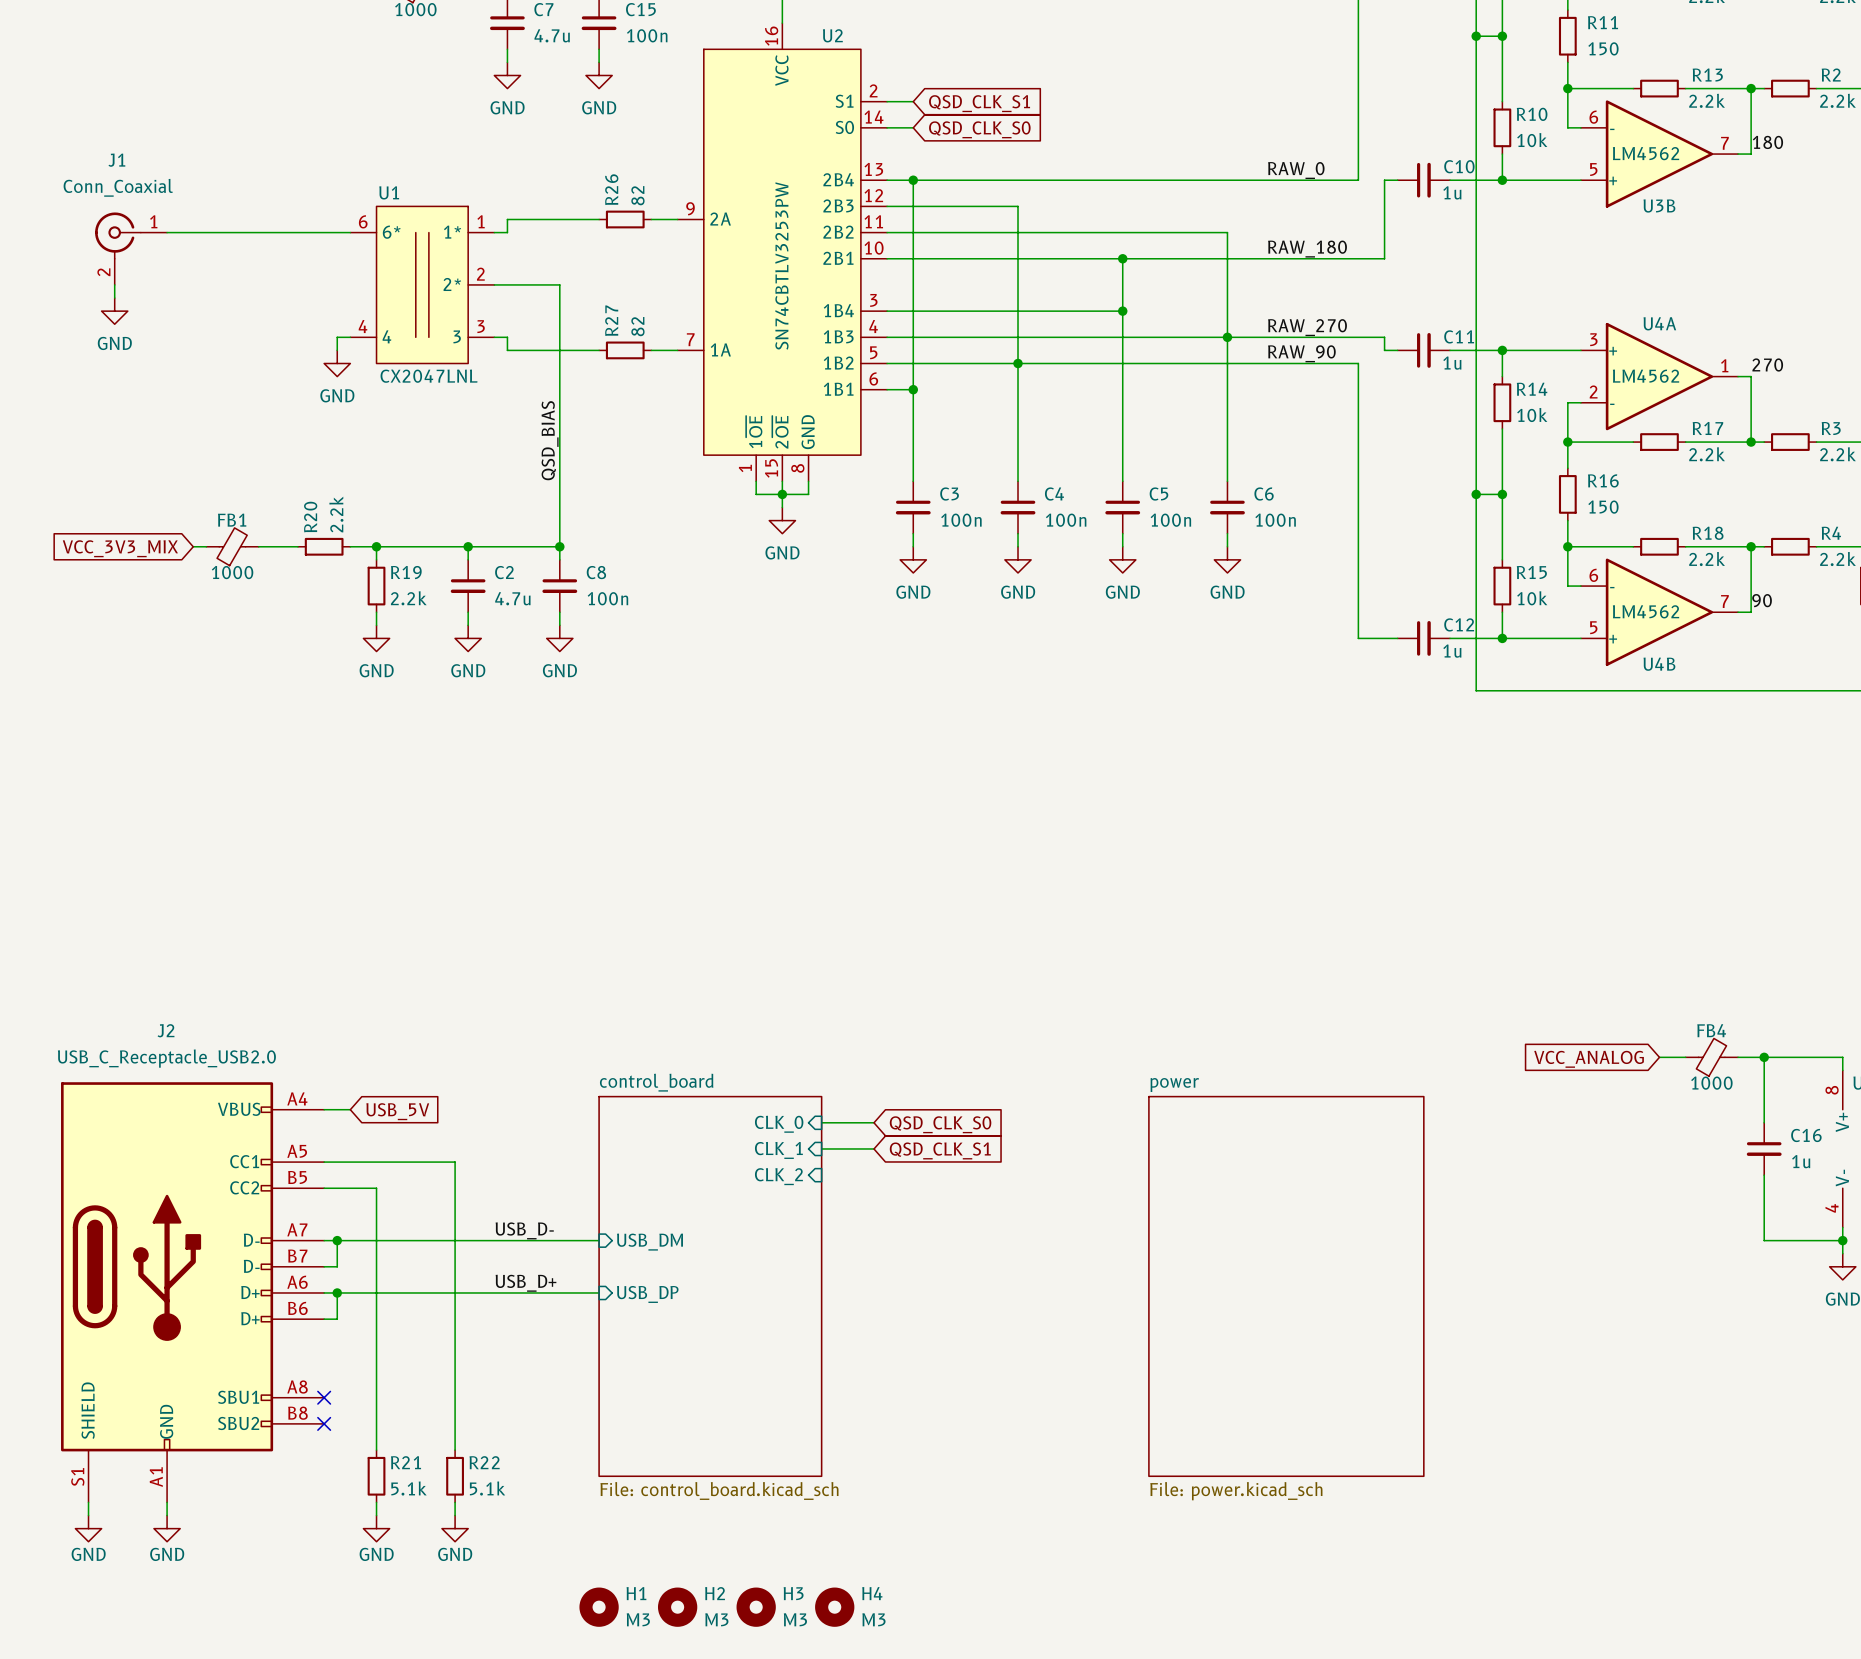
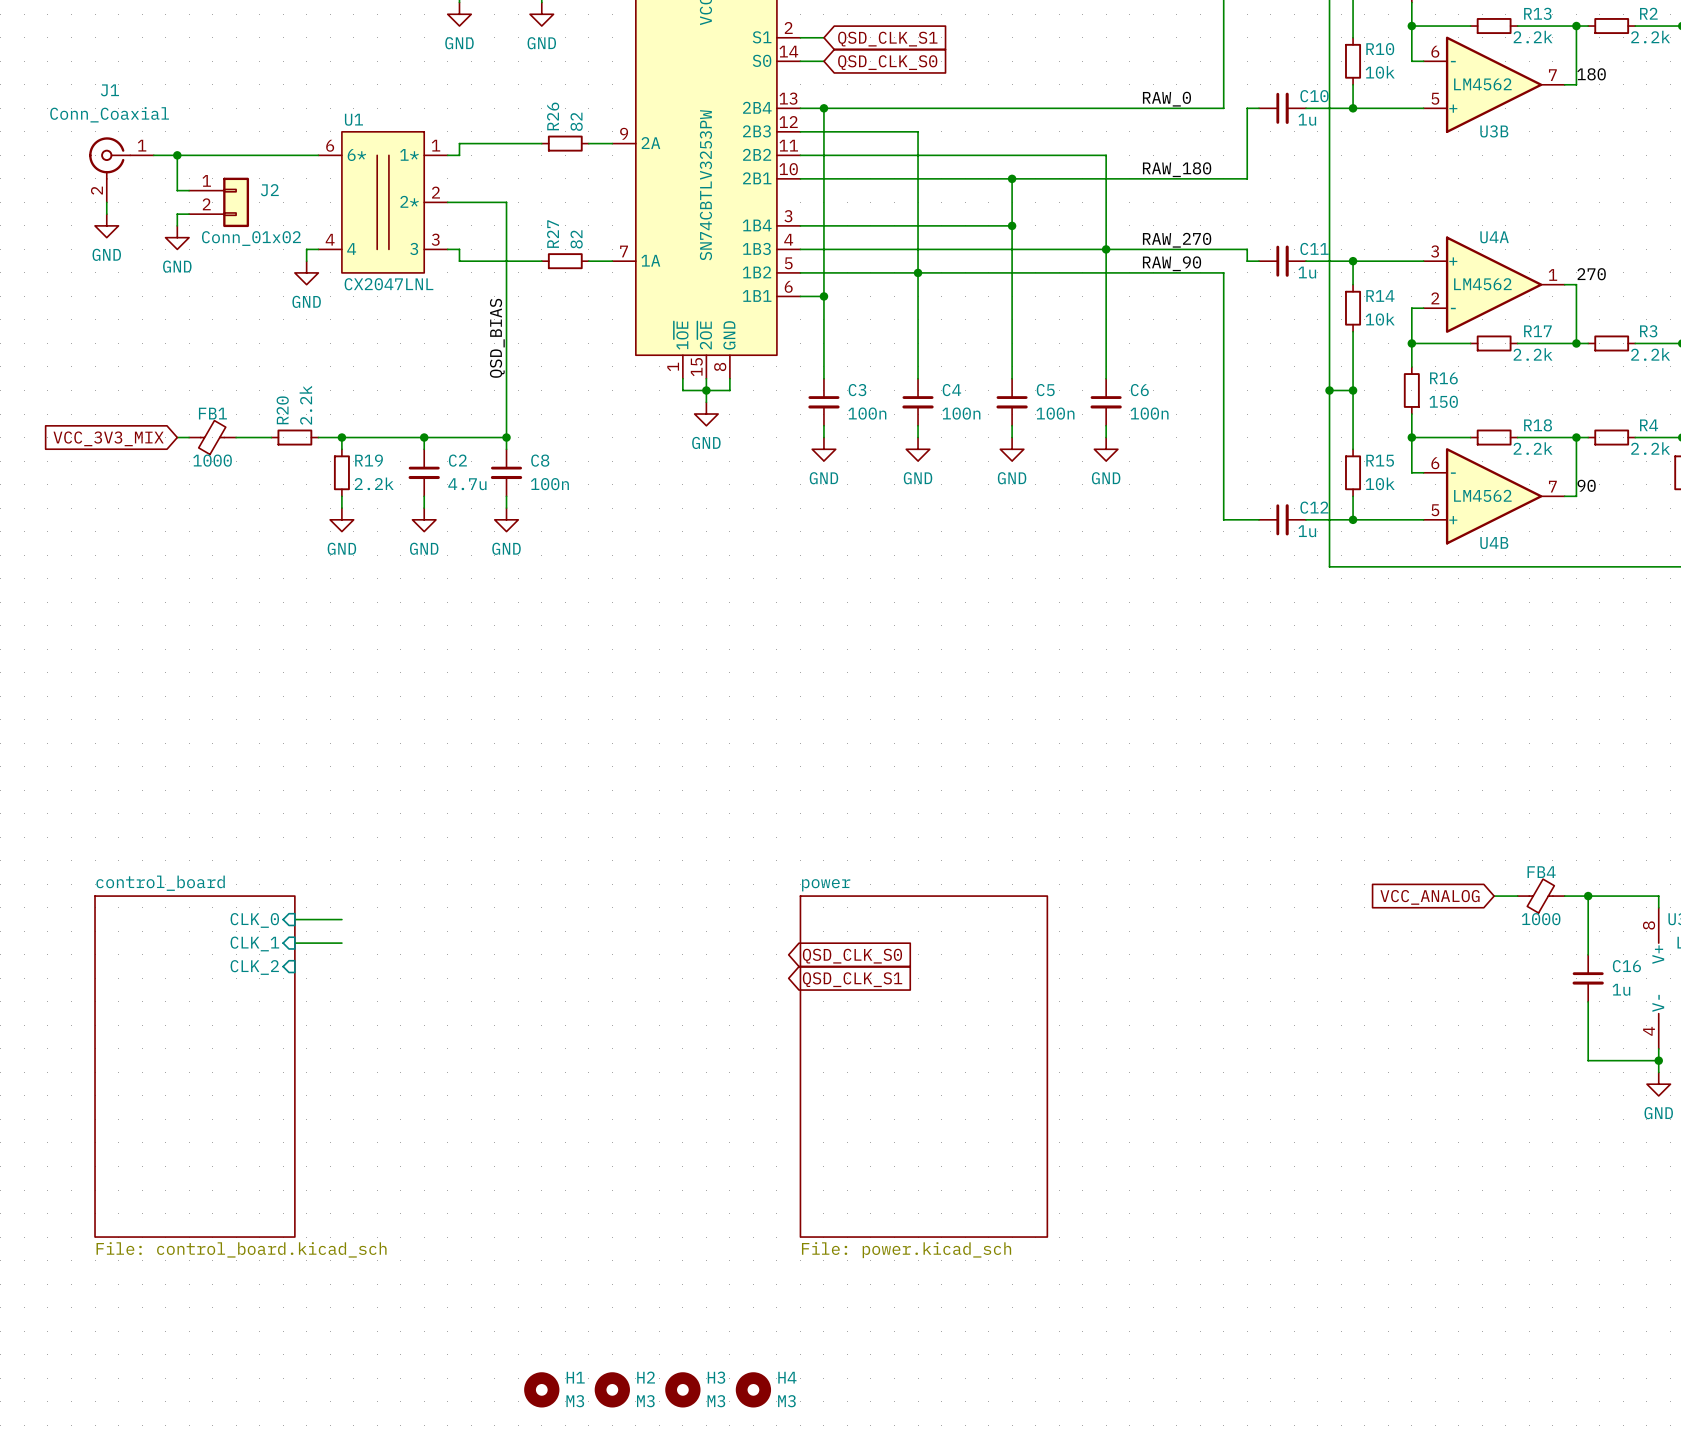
wire: none -> (177, 155) (177, 190) (189, 190)
junction: none -> (177, 155)
wire: none -> (189, 214) (177, 214) (177, 225)
power symbol: none -> GND (177, 237)
J2 name position: J2 (166, 1030) -> J2 (269, 190)
J2 value: USB_C_Receptacle_USB2.0 (166, 1058) -> Conn_01x02 (251, 238)
J2 symbol: [61, 1082, 325, 1503] -> [189, 177, 250, 228]
wire: none -> (294, 919) (341, 919)
sheet pin: none -> CLK_0 (254, 920)
wire: none -> (318, 943) (341, 943)
sheet pin: none -> CLK_1 (254, 943)
global label: USB_5V (397, 1111) -> none
wire: (821, 1122) (874, 1122) -> none
sheet pin: CLK_0 (779, 1124) -> none
sheet pin: none -> CLK_2 (254, 967)
wire: (821, 1148) (874, 1148) -> none
sheet pin: CLK_1 (778, 1150) -> none
wire: (324, 1162) (455, 1162) (455, 1450) -> none
sheet pin: CLK_2 (778, 1176) -> none
wire: (324, 1188) (376, 1188) (376, 1450) -> none
label: USB_D- (524, 1230) -> none
wire: (324, 1240) (599, 1240) -> none
wire: (337, 1240) (337, 1266) (324, 1266) -> none
junction: (337, 1240) -> none
sheet pin: USB_DM (649, 1242) -> none
sheet control_board: none -> File: control_board.kicad_sch (194, 1066)
sheet power: none -> File: power.kicad_sch (923, 1066)
label: USB_D+ (526, 1283) -> none
sheet control_board: File: control_board.kicad_sch (710, 1286) -> none
sheet power: File: power.kicad_sch (1286, 1286) -> none
wire: (324, 1292) (599, 1292) -> none
wire: (337, 1292) (337, 1319) (324, 1319) -> none
junction: (337, 1292) -> none
sheet pin: USB_DP (647, 1294) -> none
no-connect mark: (324, 1397) -> none
no-connect mark: (324, 1423) -> none
R21: 5.1k (376, 1476) -> none
R22: 5.1k (455, 1476) -> none
wire: (88, 1502) (88, 1515) -> none
wire: (167, 1502) (167, 1515) -> none
wire: (376, 1502) (376, 1515) -> none
wire: (455, 1502) (455, 1515) -> none
power symbol: GND (88, 1528) -> none
power symbol: GND (167, 1528) -> none
power symbol: GND (376, 1528) -> none
power symbol: GND (455, 1528) -> none

